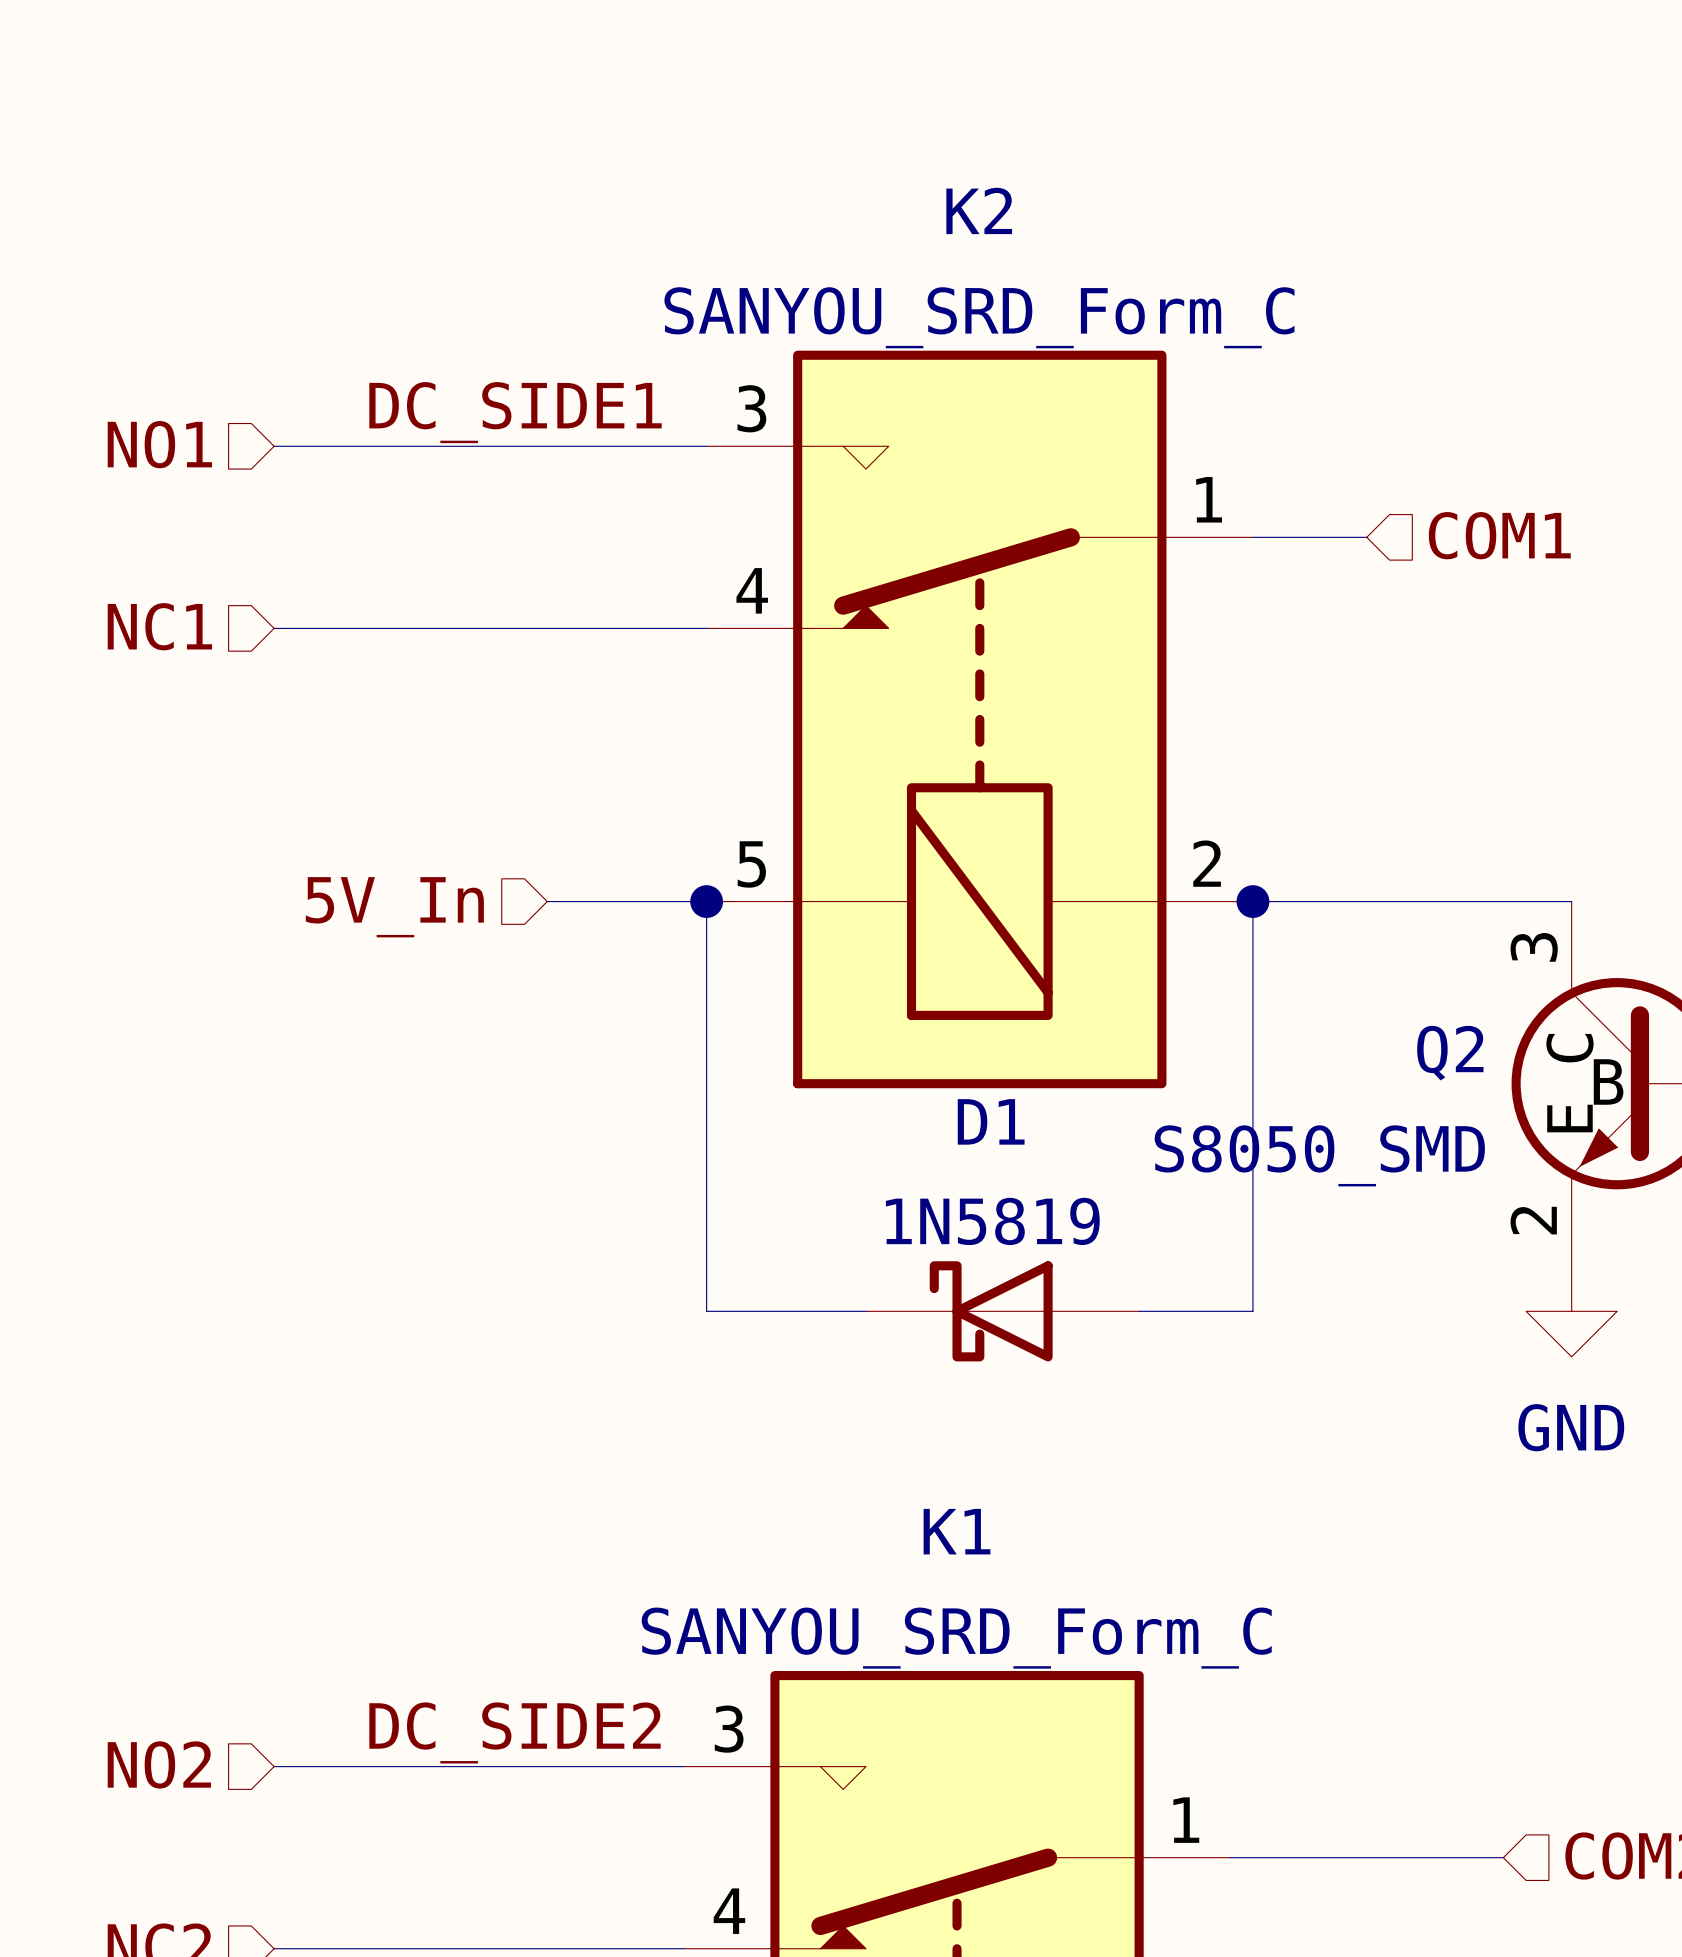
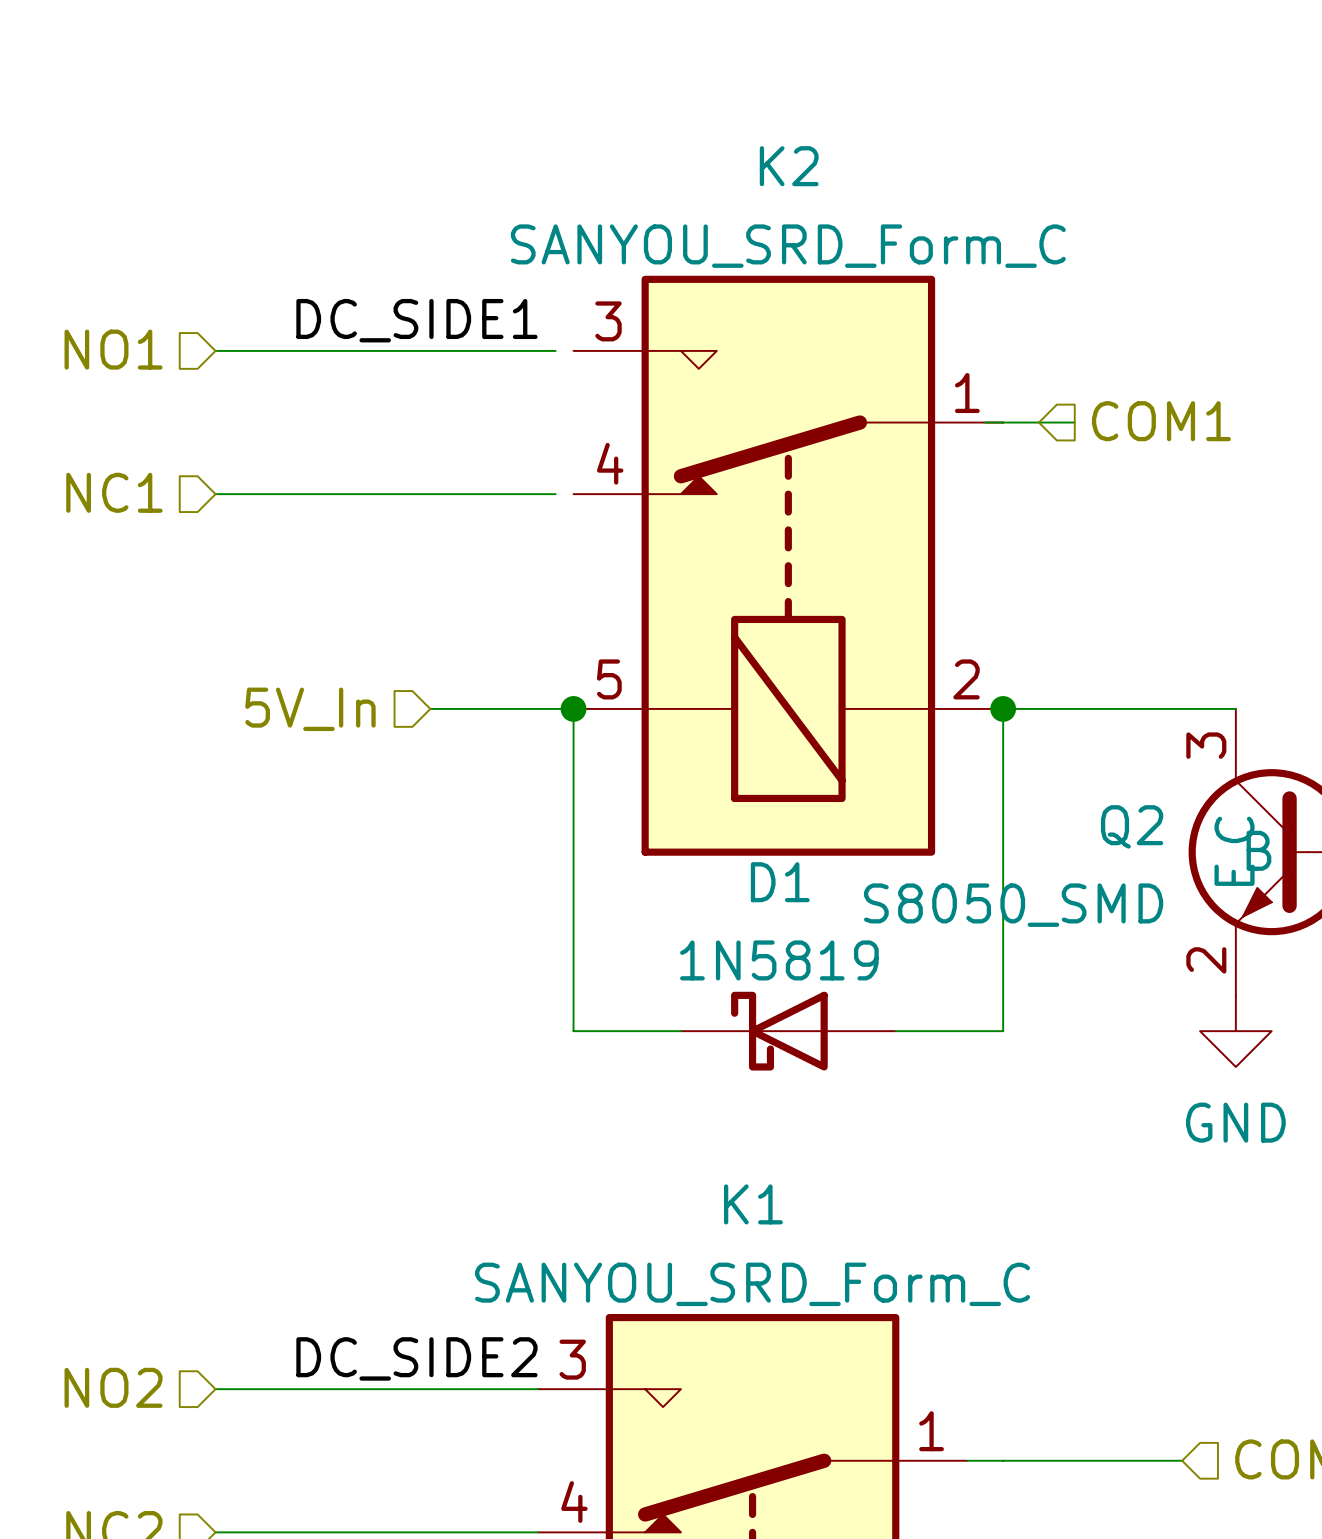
hierarchical label position: COM1 (1499, 535) -> COM1 (1161, 421)
K2 position: (979, 719) -> (788, 565)
wire: (706, 901) (706, 1311) (729, 1311) -> (555, 708) (573, 708) (573, 1031)
junction position: (706, 901) -> (573, 708)
junction position: (1252, 901) -> (1003, 708)
wire: (1275, 901) (1252, 901) (1252, 1311) -> (1003, 708) (1003, 1031) (985, 1031)

